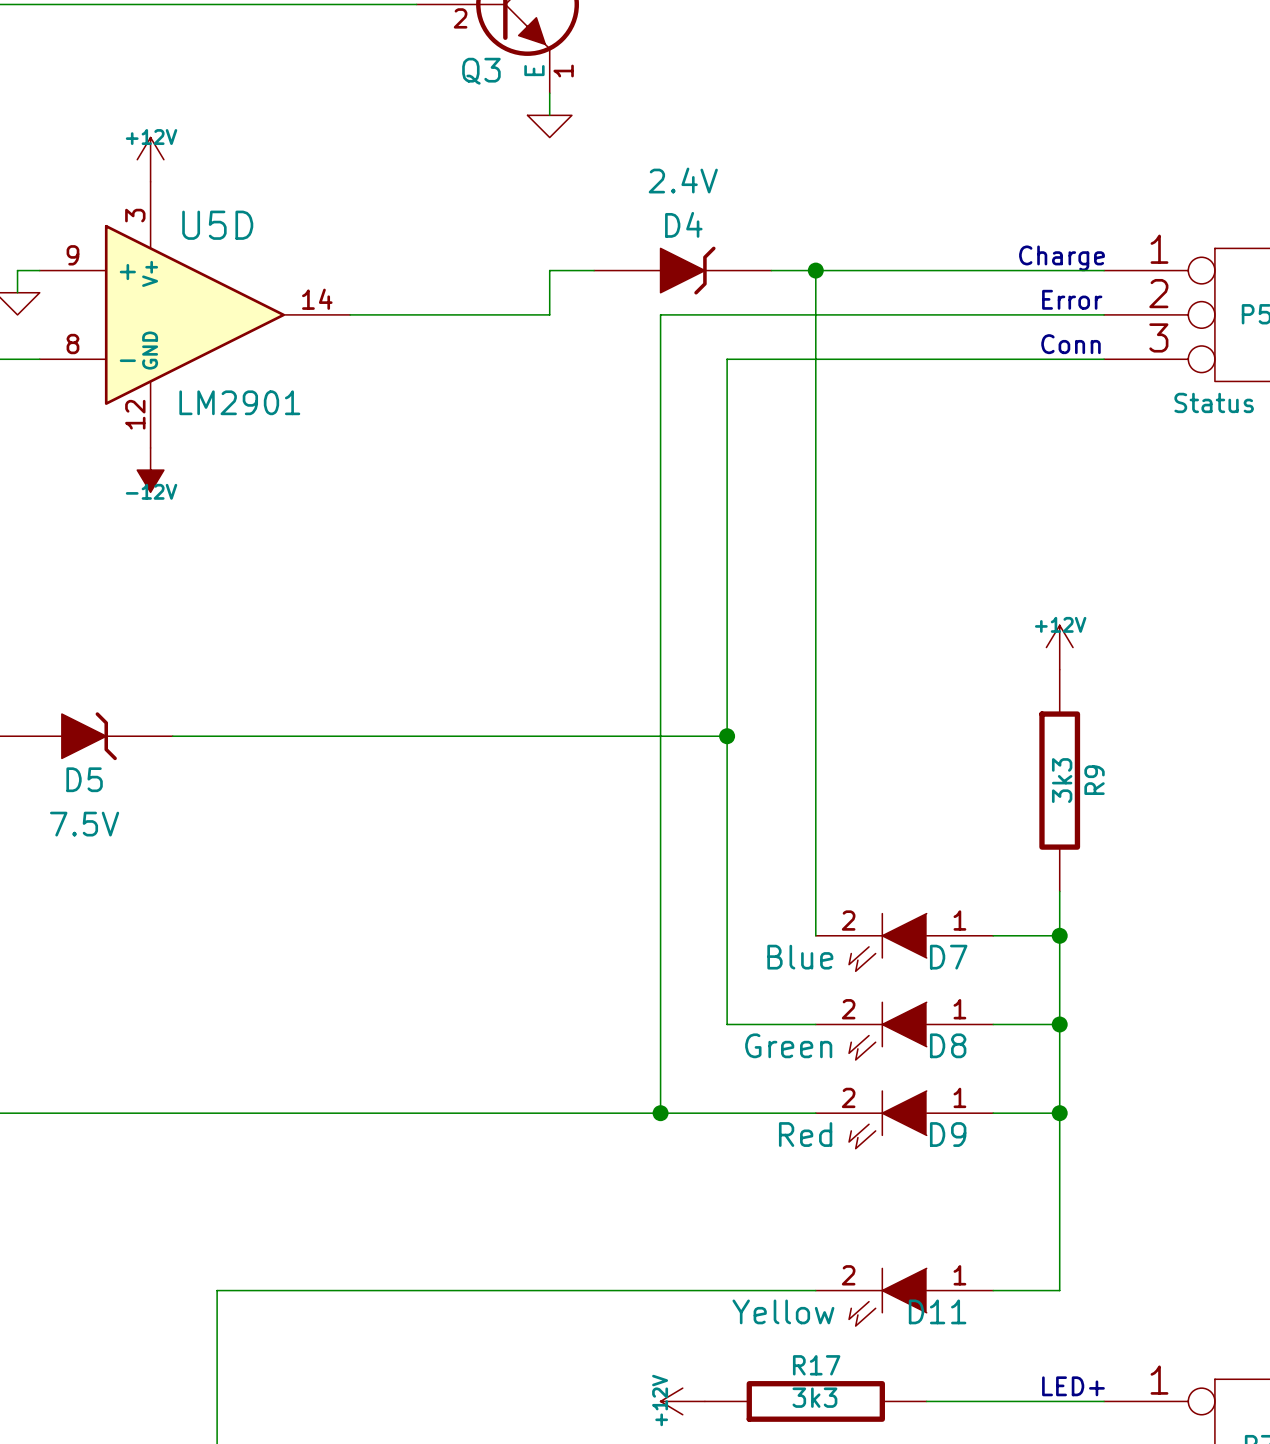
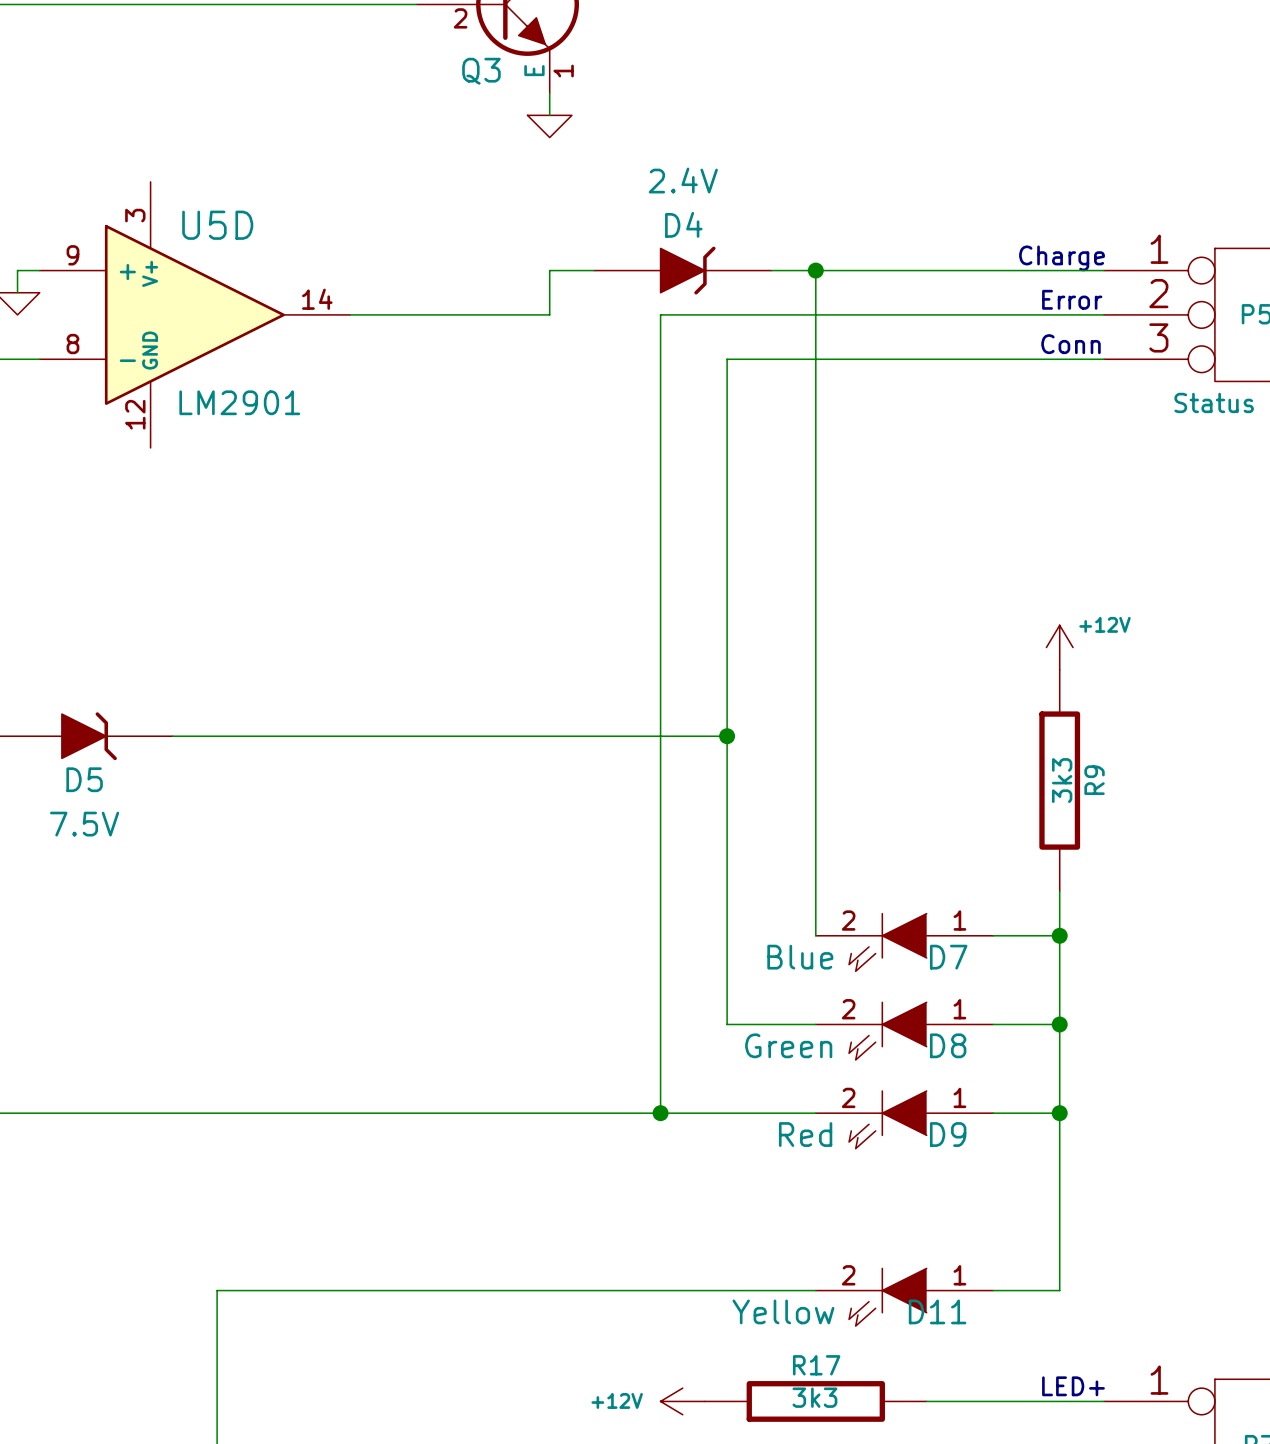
power symbol: +12V (150, 159) -> none
power symbol: -12V (150, 470) -> none
power symbol text position: +12V (1060, 624) -> +12V (1105, 624)
power symbol text rotation: 0° (660, 1400) -> 90° clockwise (617, 1400)

